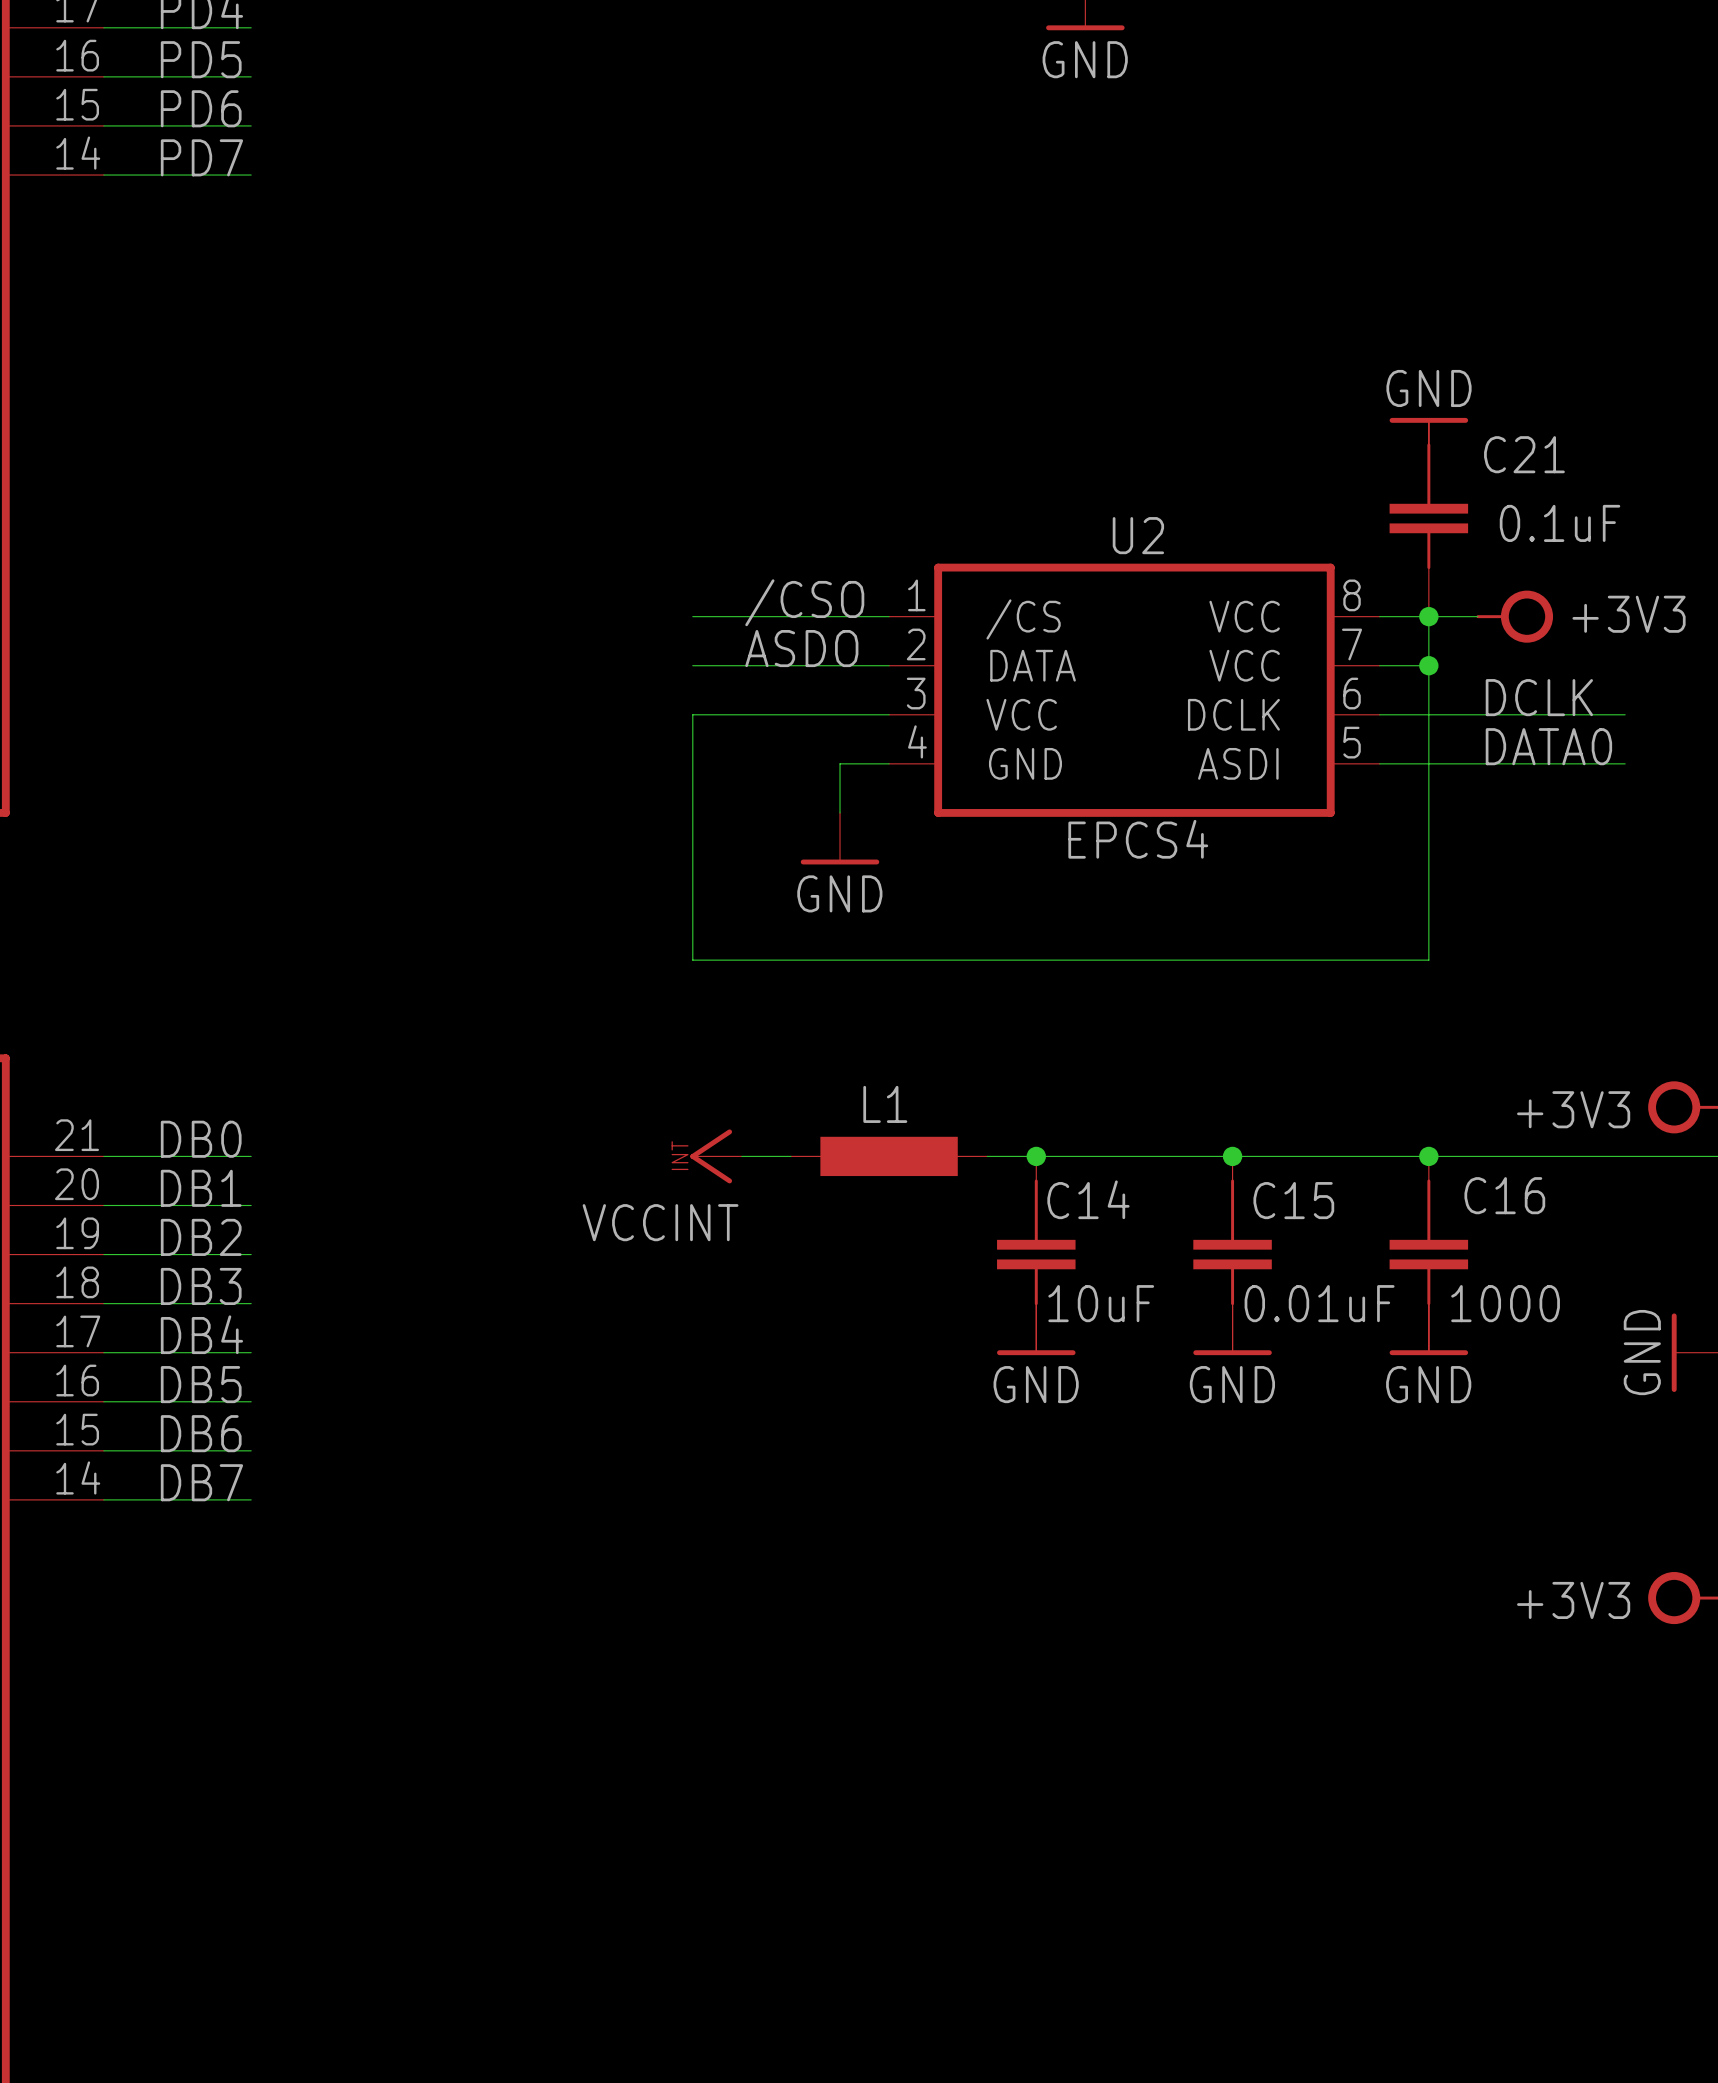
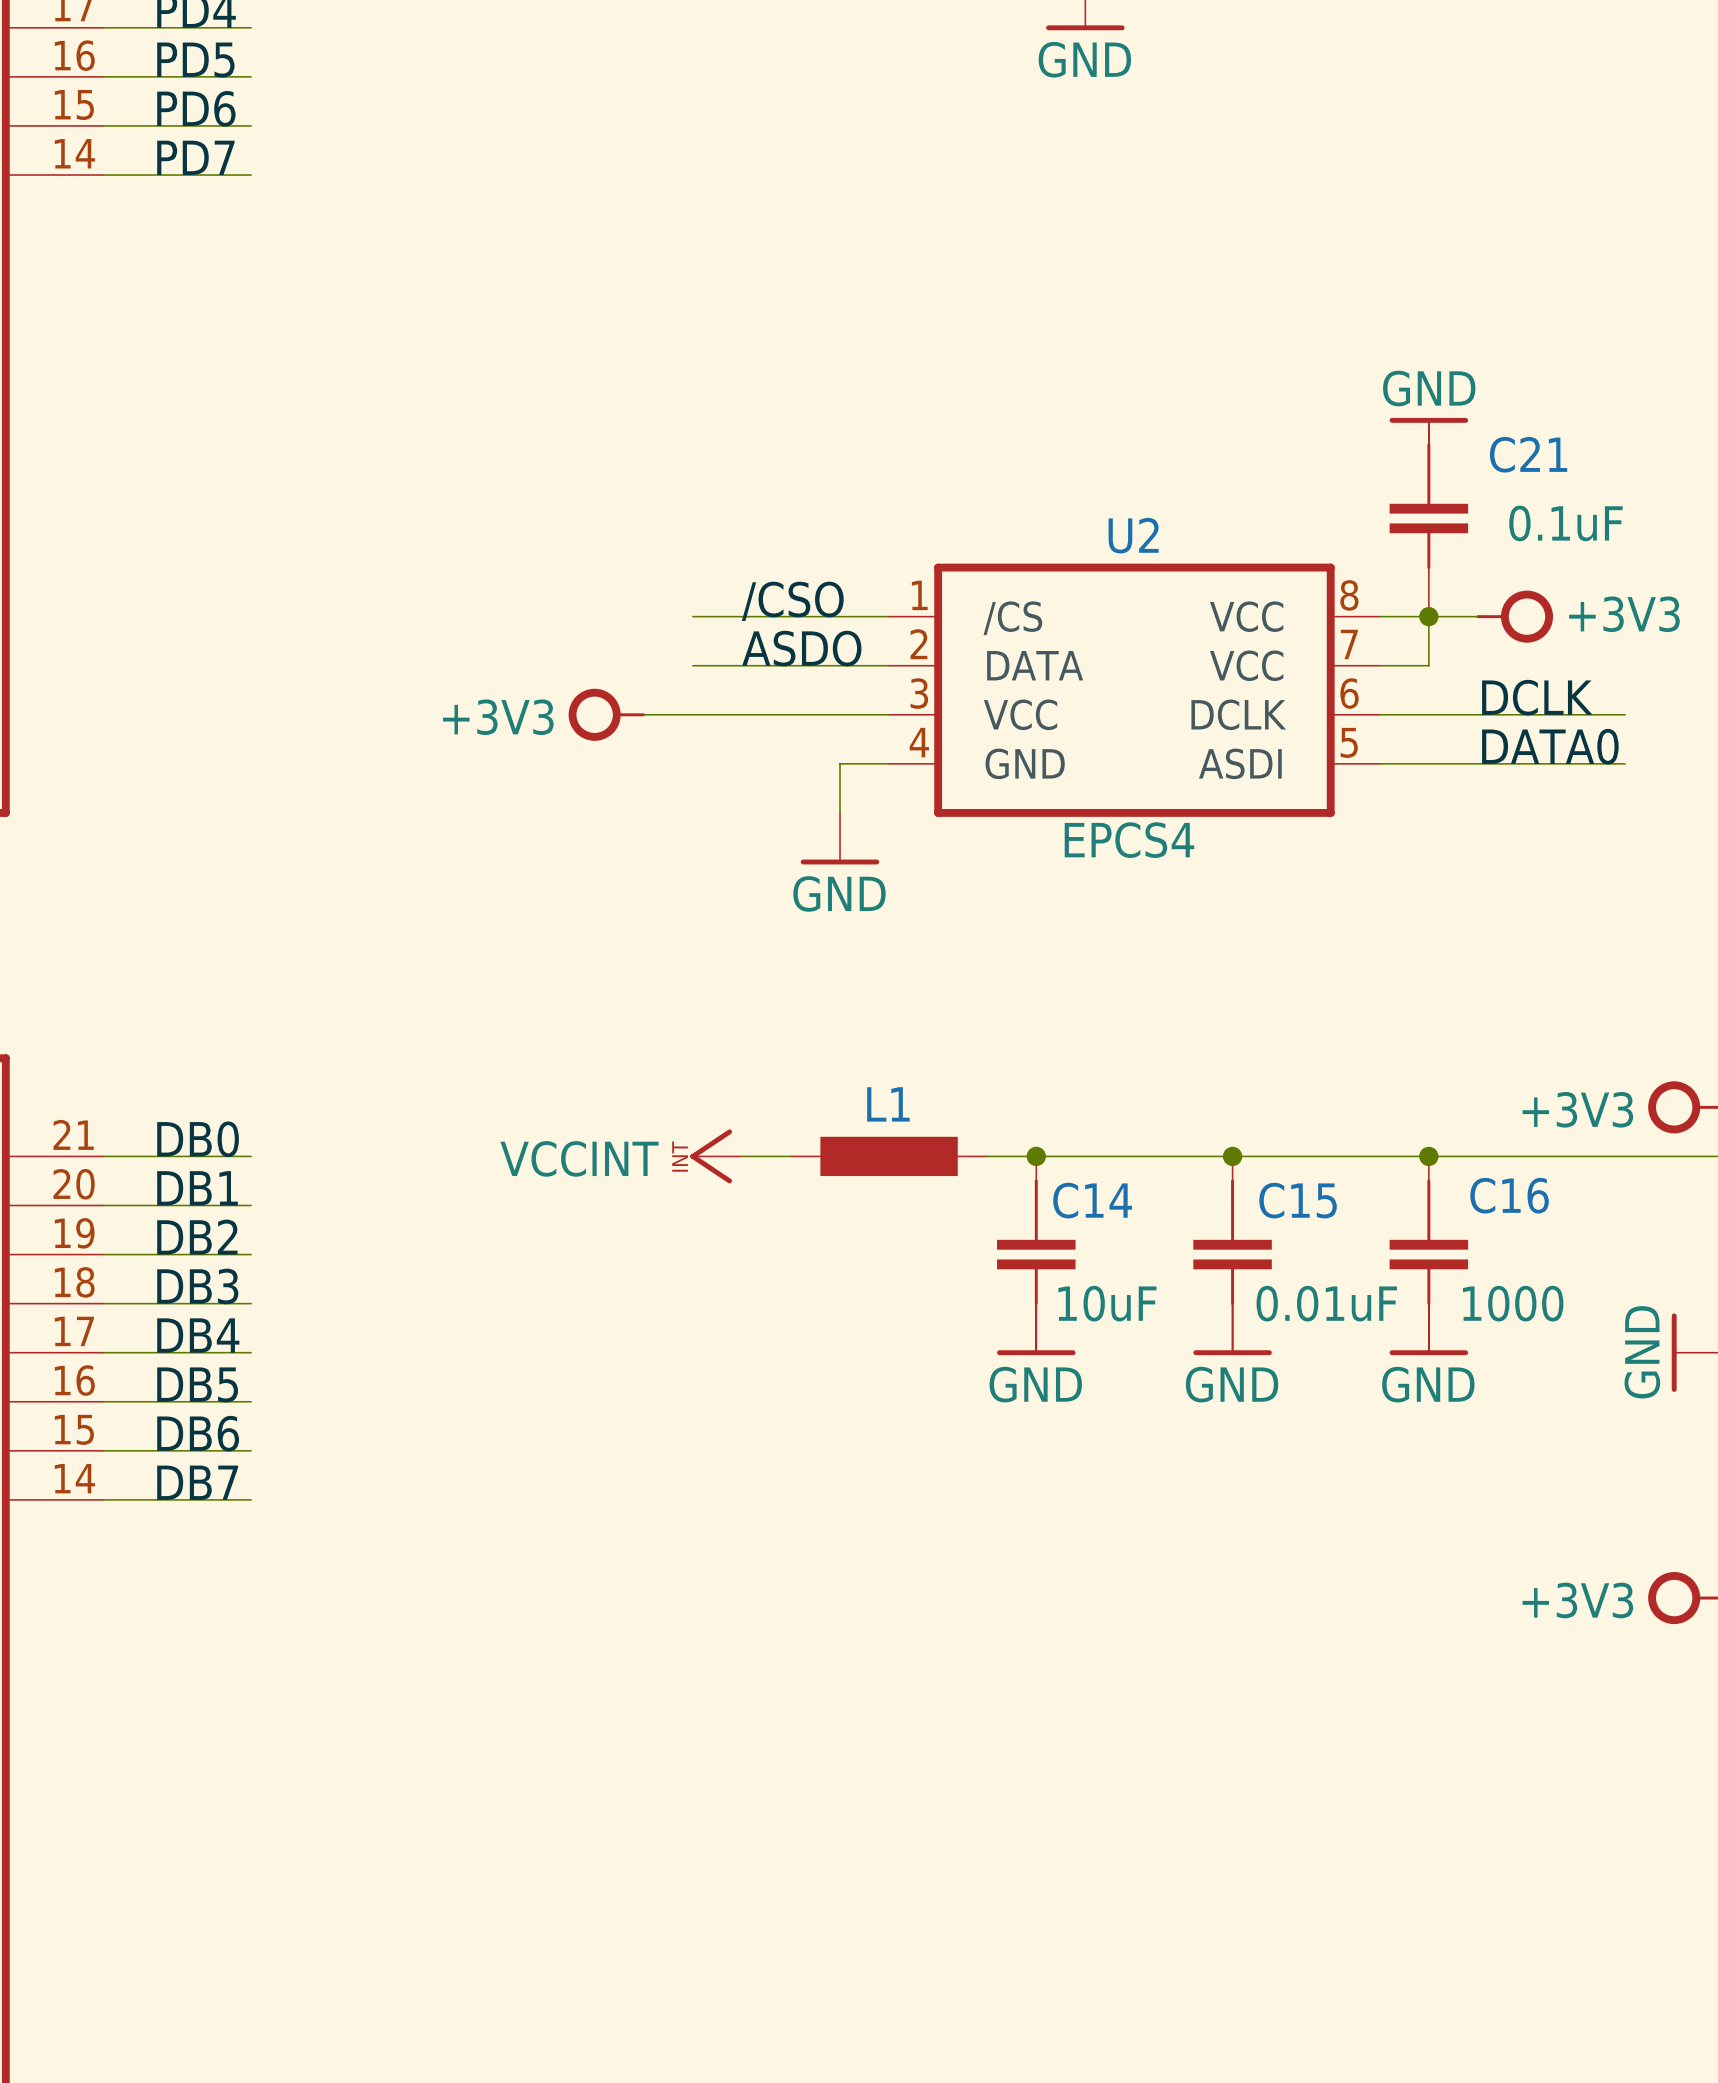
wire: (1428, 665) (1428, 960) (692, 960) (692, 714) -> (643, 714) (692, 714)
junction: (1428, 665) -> none
power symbol: none -> +3V3 (606, 714)
power symbol text position: VCCINT (660, 1222) -> VCCINT (579, 1158)

